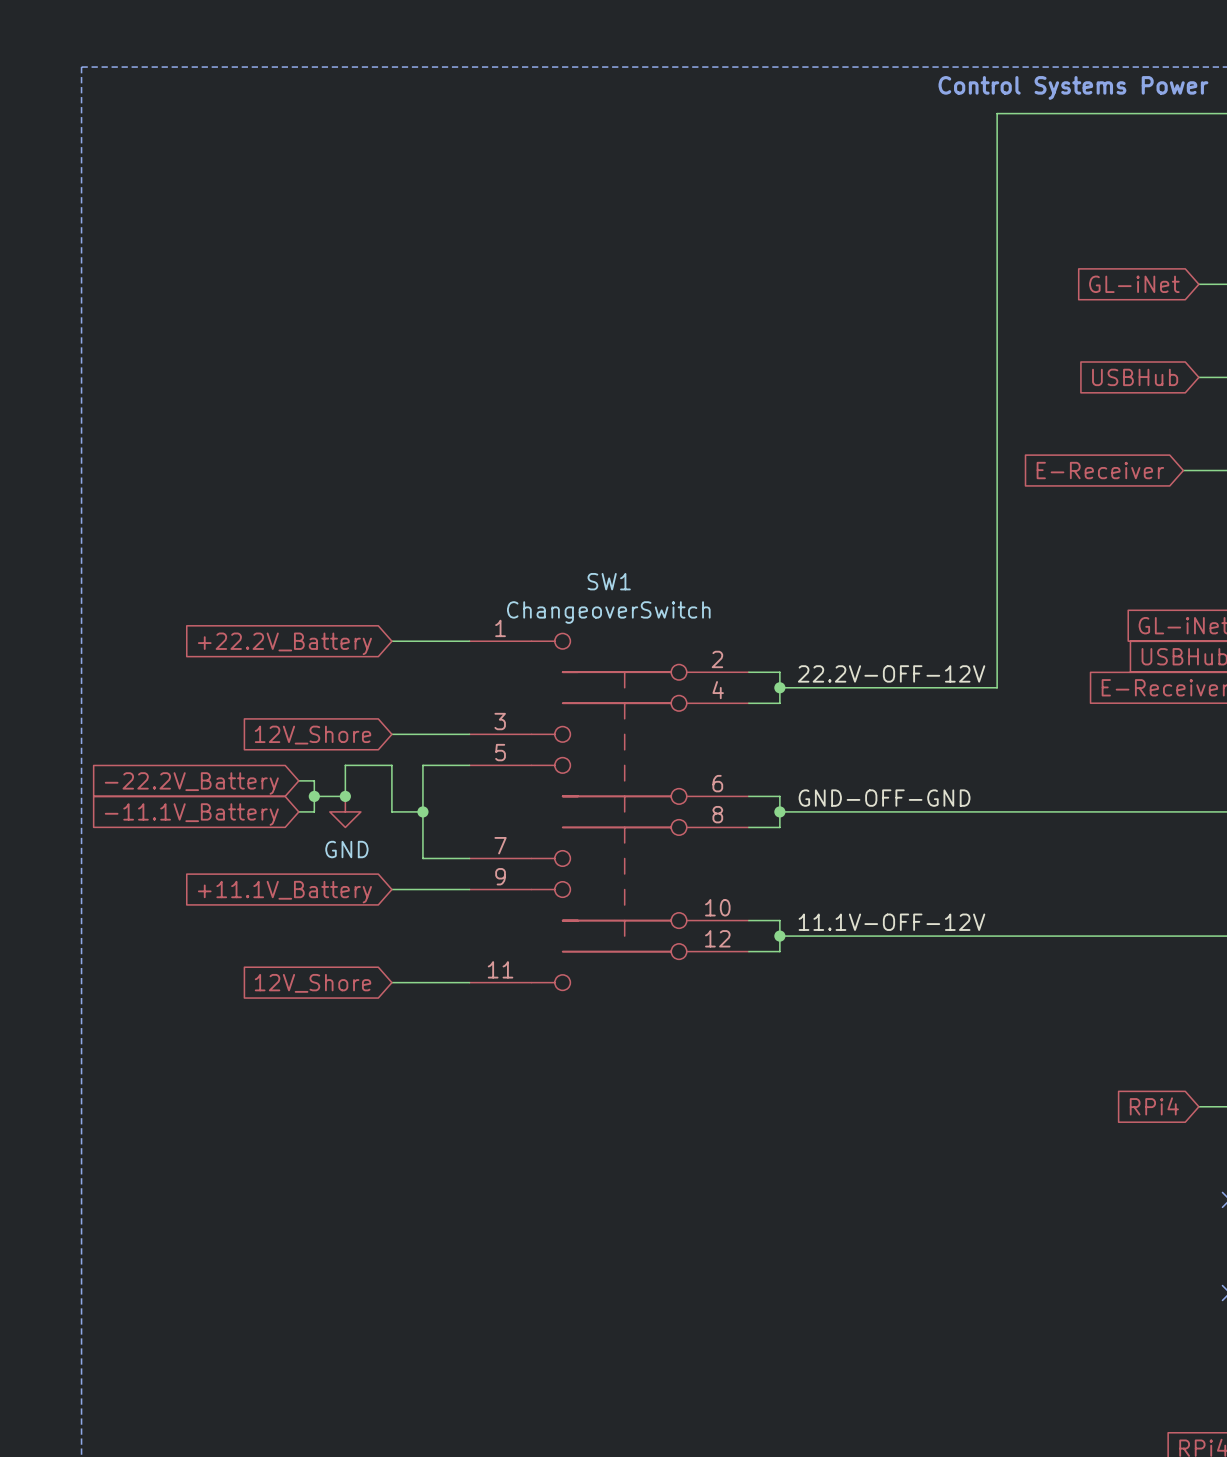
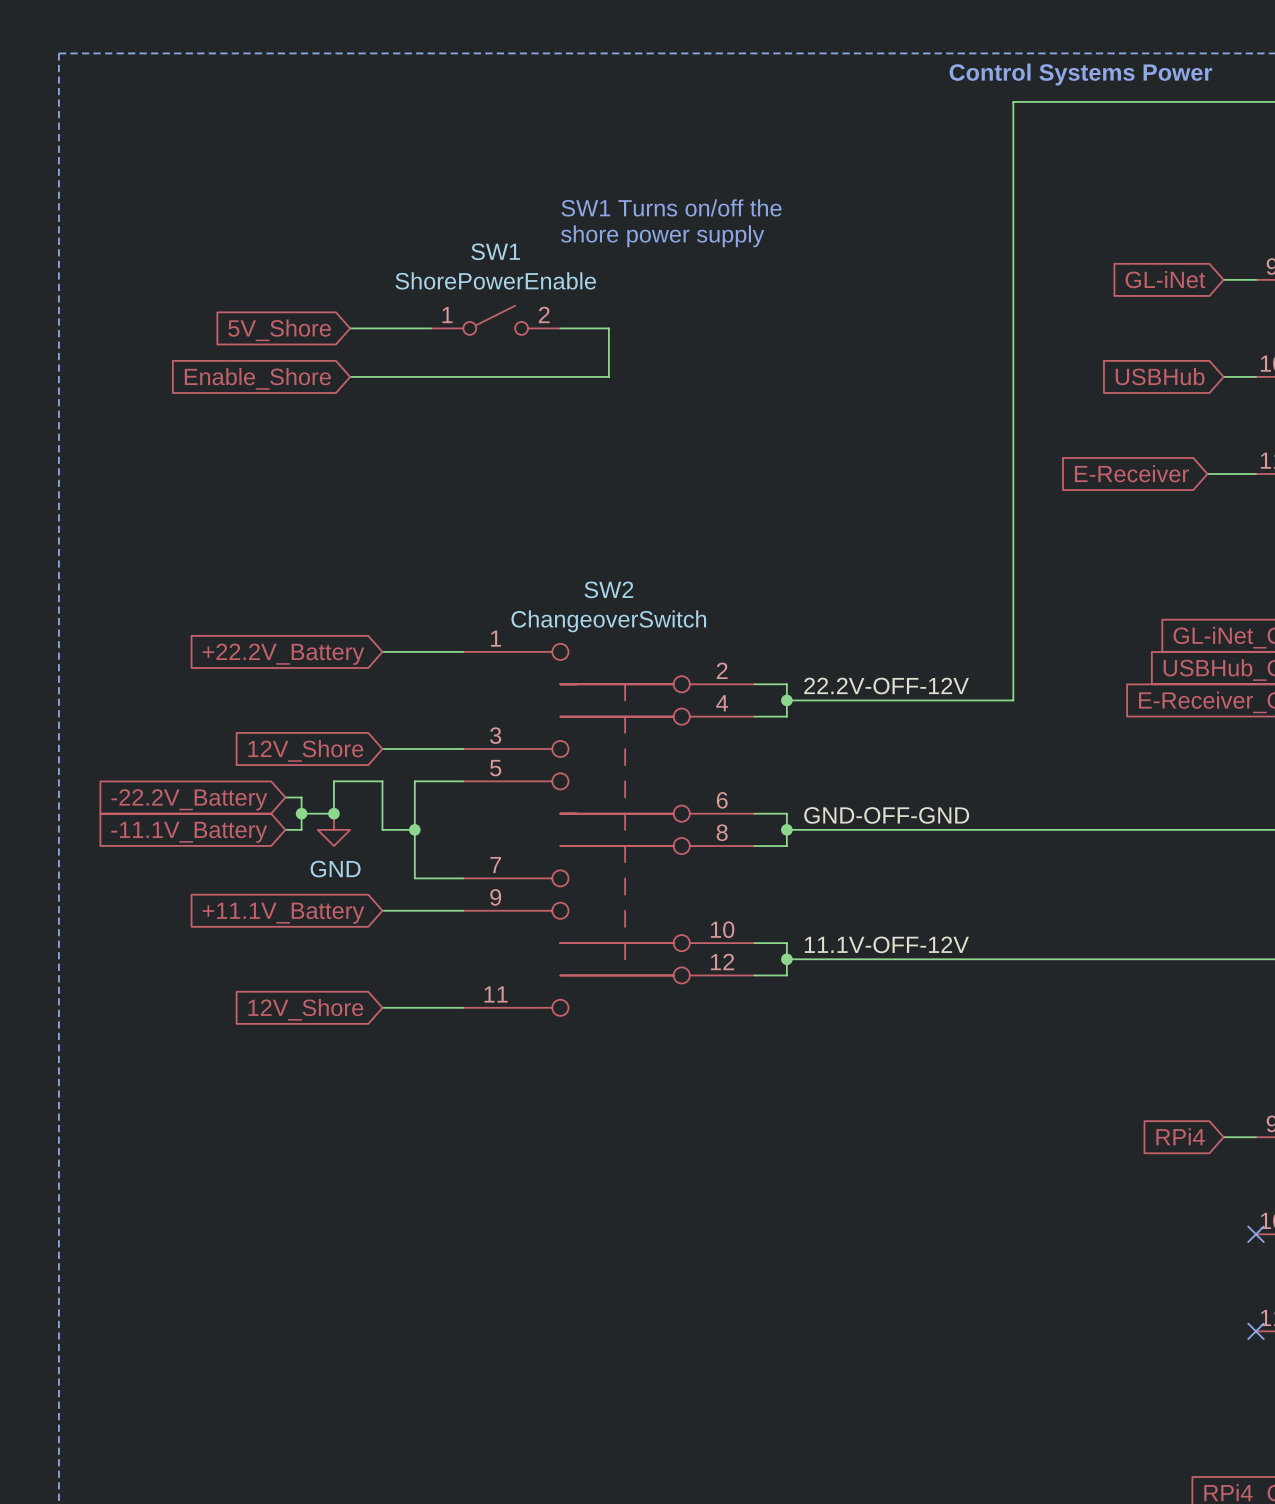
text: none -> SW1 Turns on/off the (671, 207)
text: none -> shore power supply (662, 236)
SW1: none -> ShorePowerEnable (495, 320)
wire: none -> (350, 328) (431, 328)
wire: none -> (560, 328) (608, 328) (608, 376) (350, 376)
global label: none -> 5V_Shore (279, 330)
global label: none -> Enable_Shore (257, 378)
SW1 name: SW1 (609, 581) -> SW2 (608, 589)

